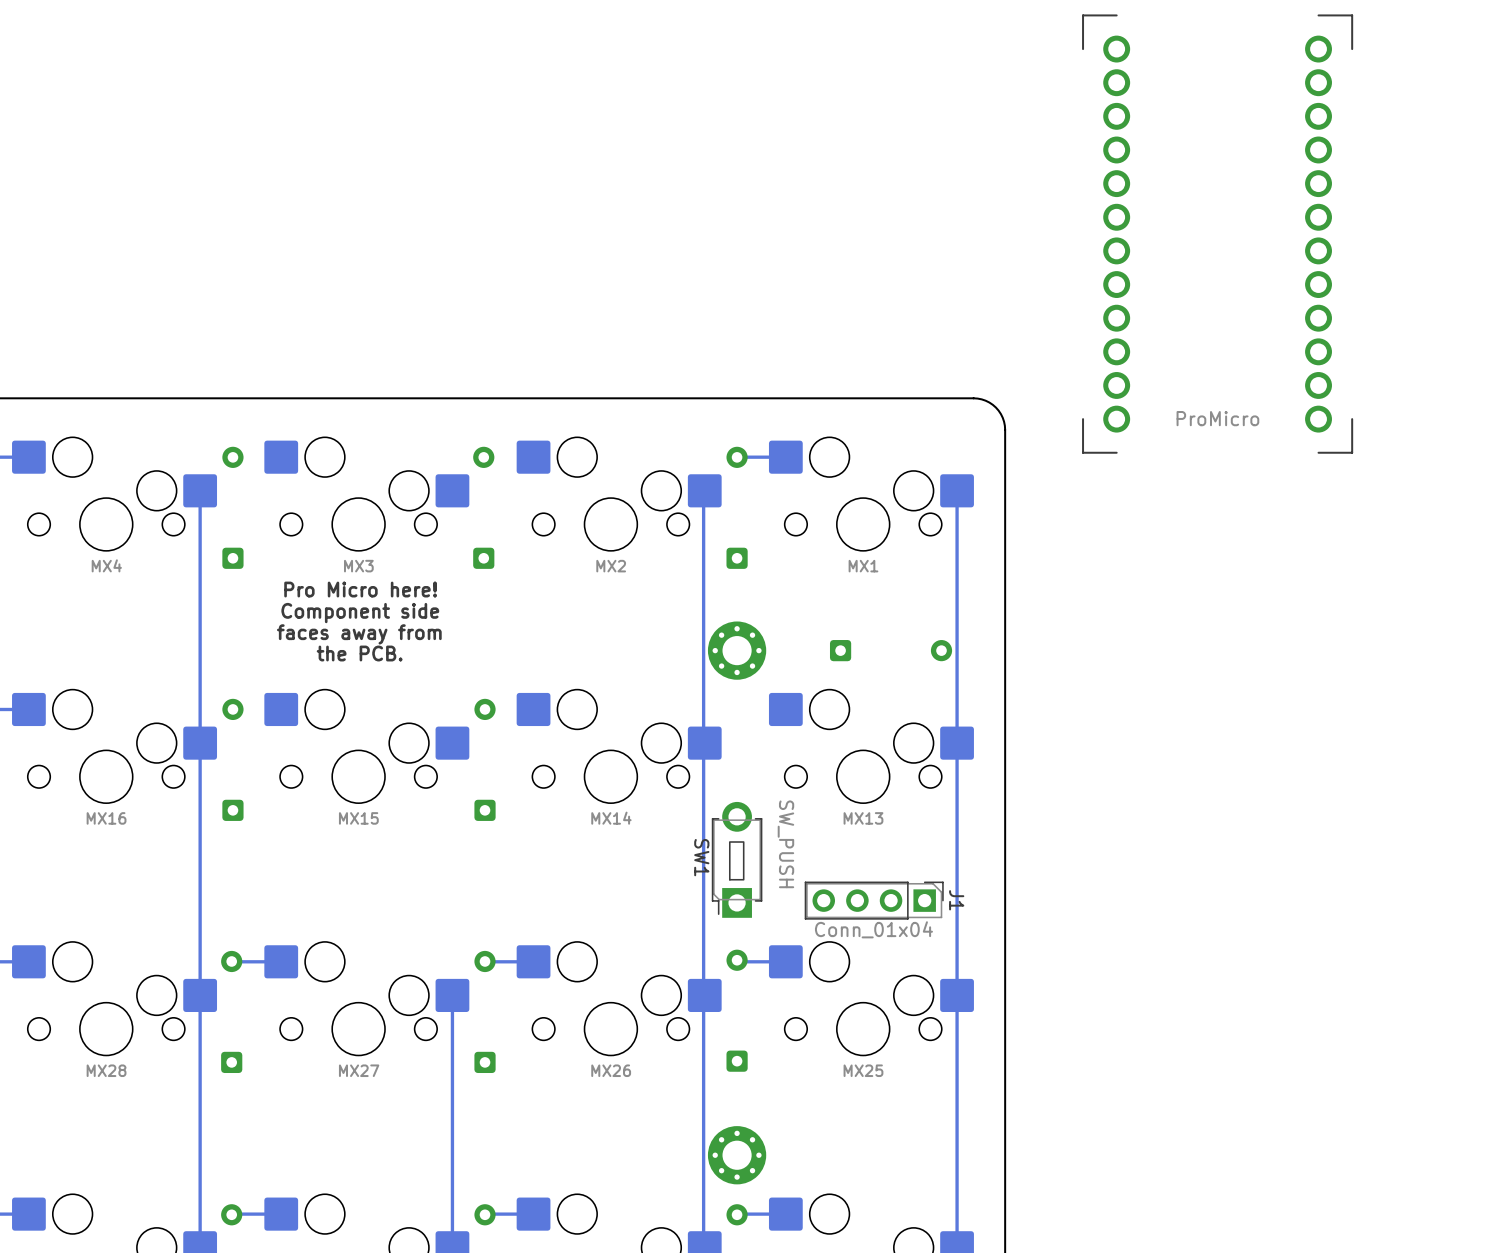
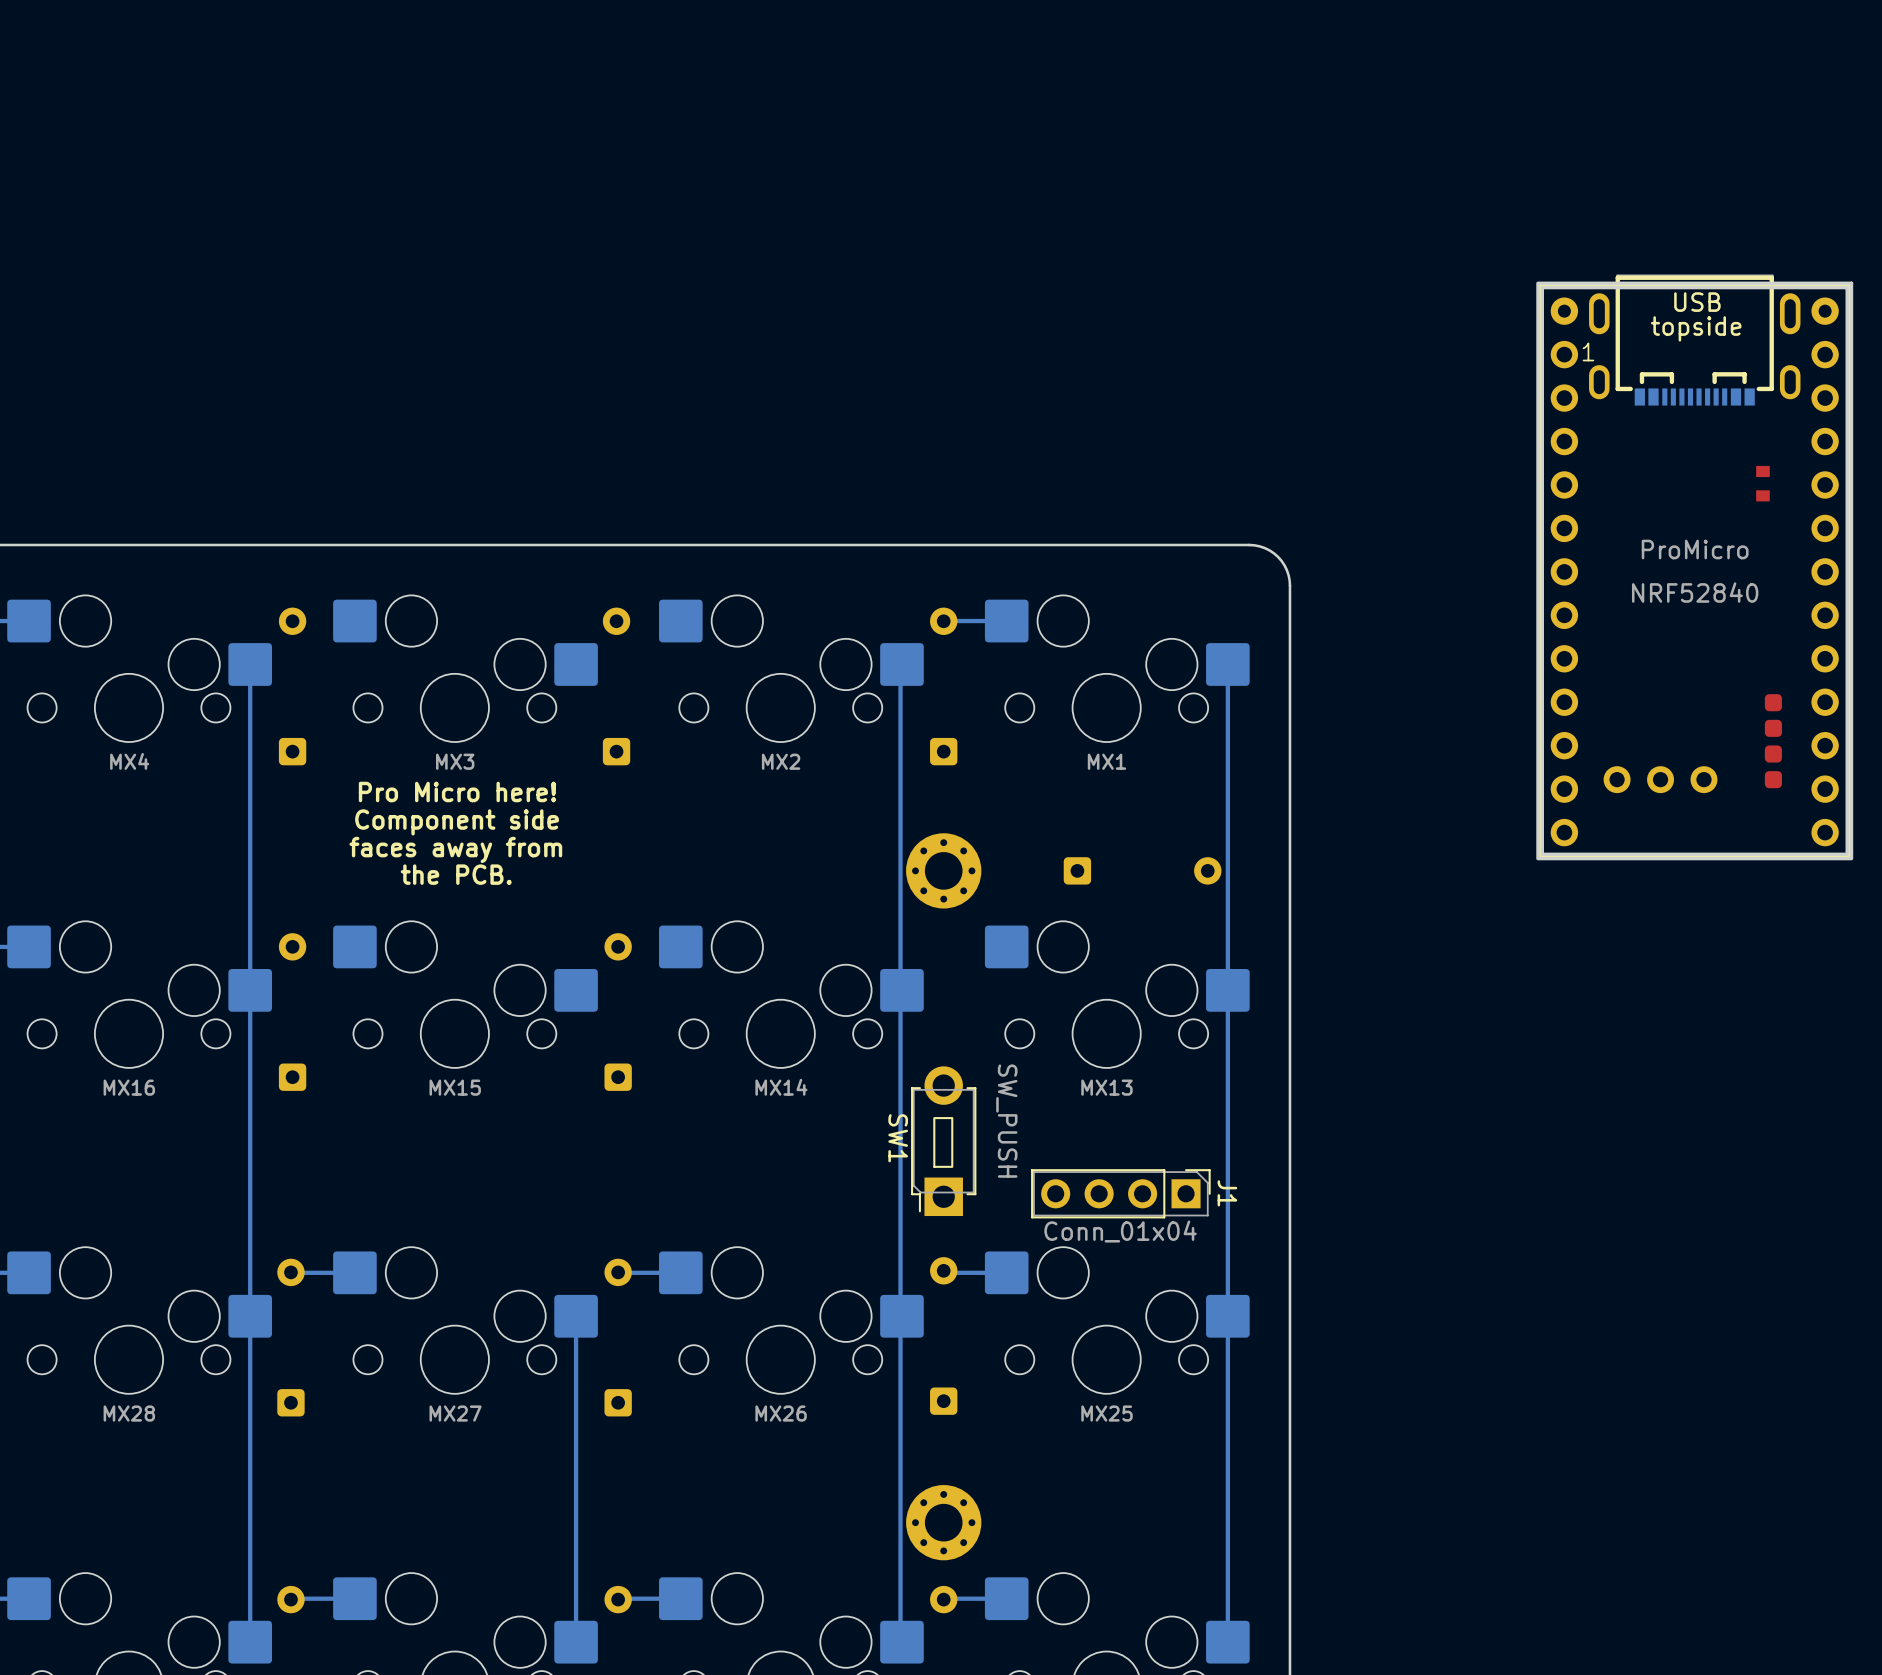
part: ProMicro (1217, 234) -> none
part: none -> ProMicro (1694, 567)

